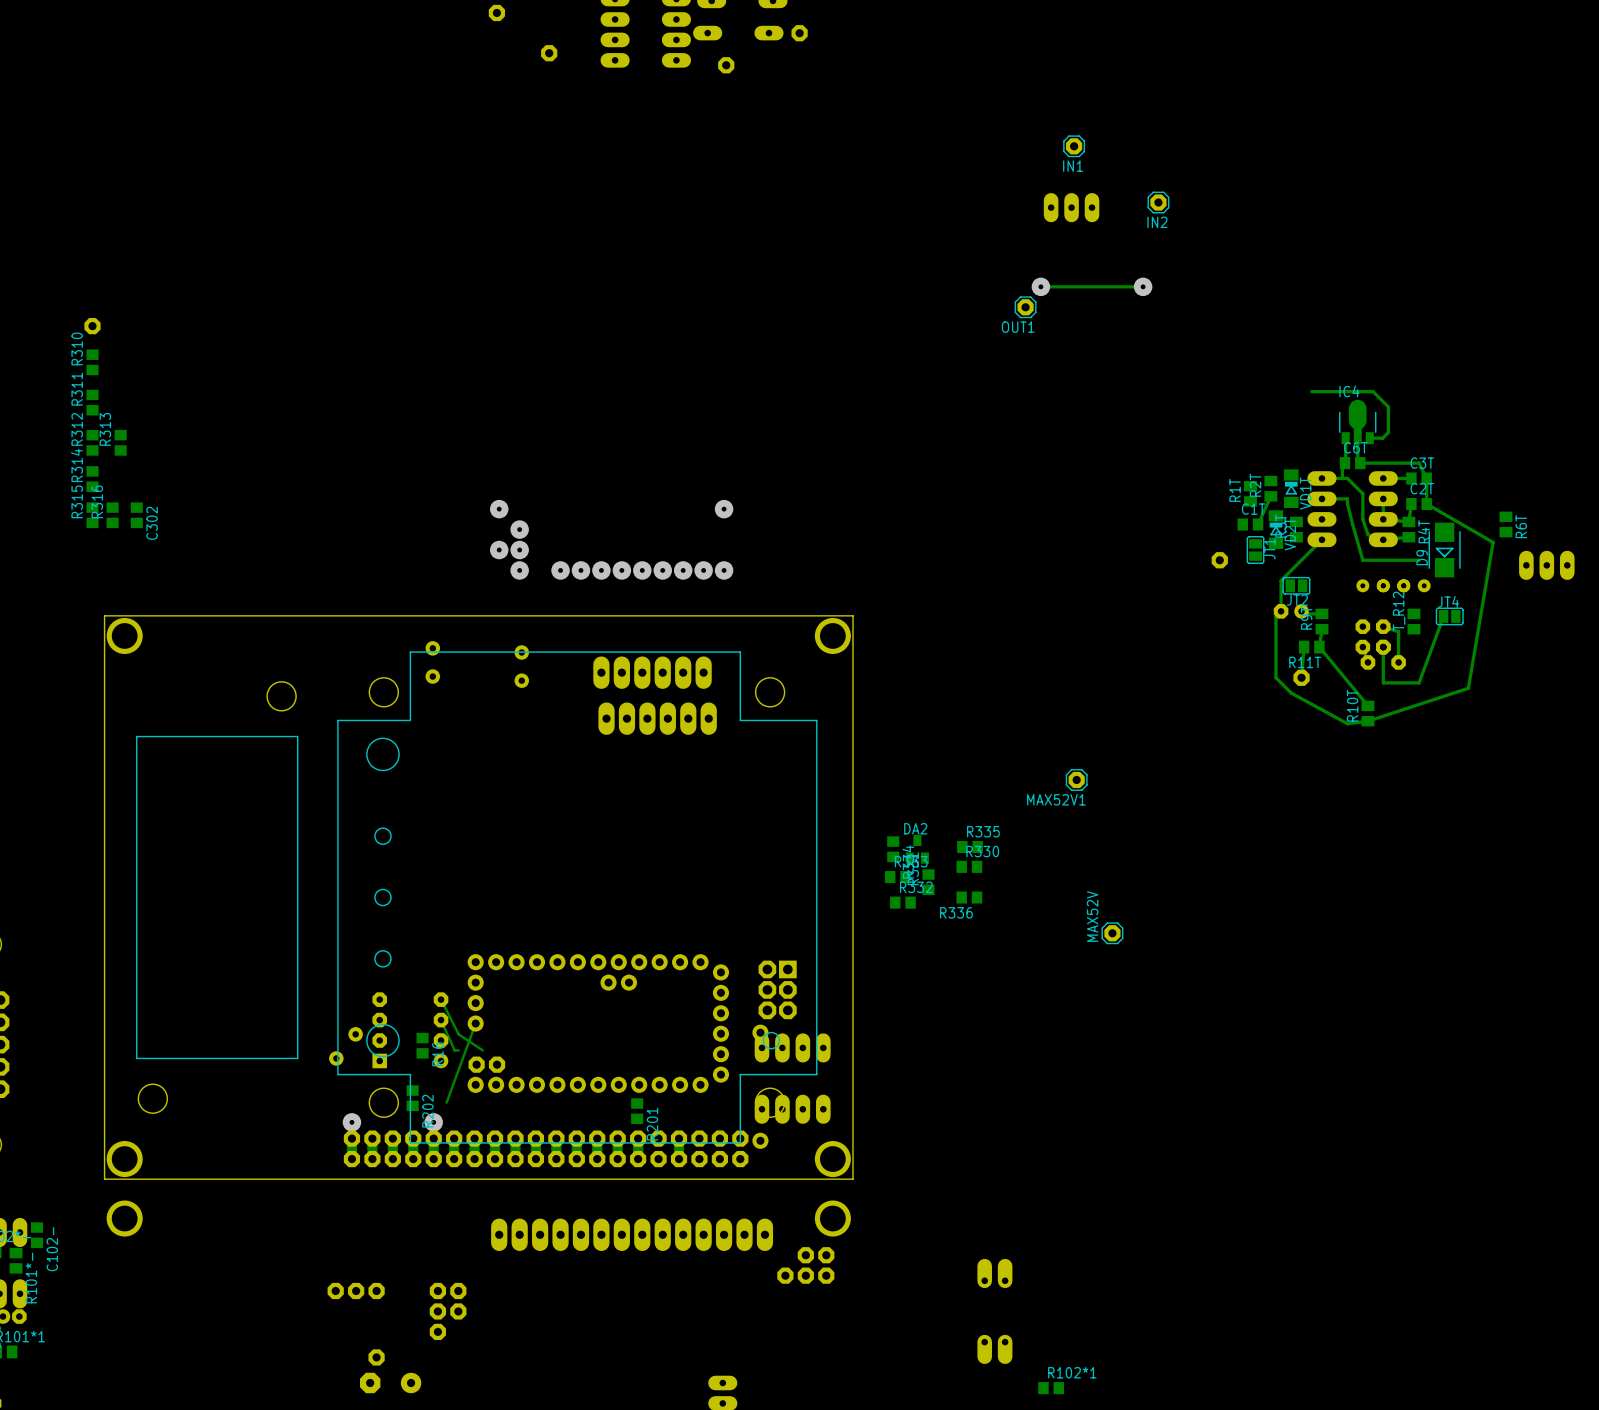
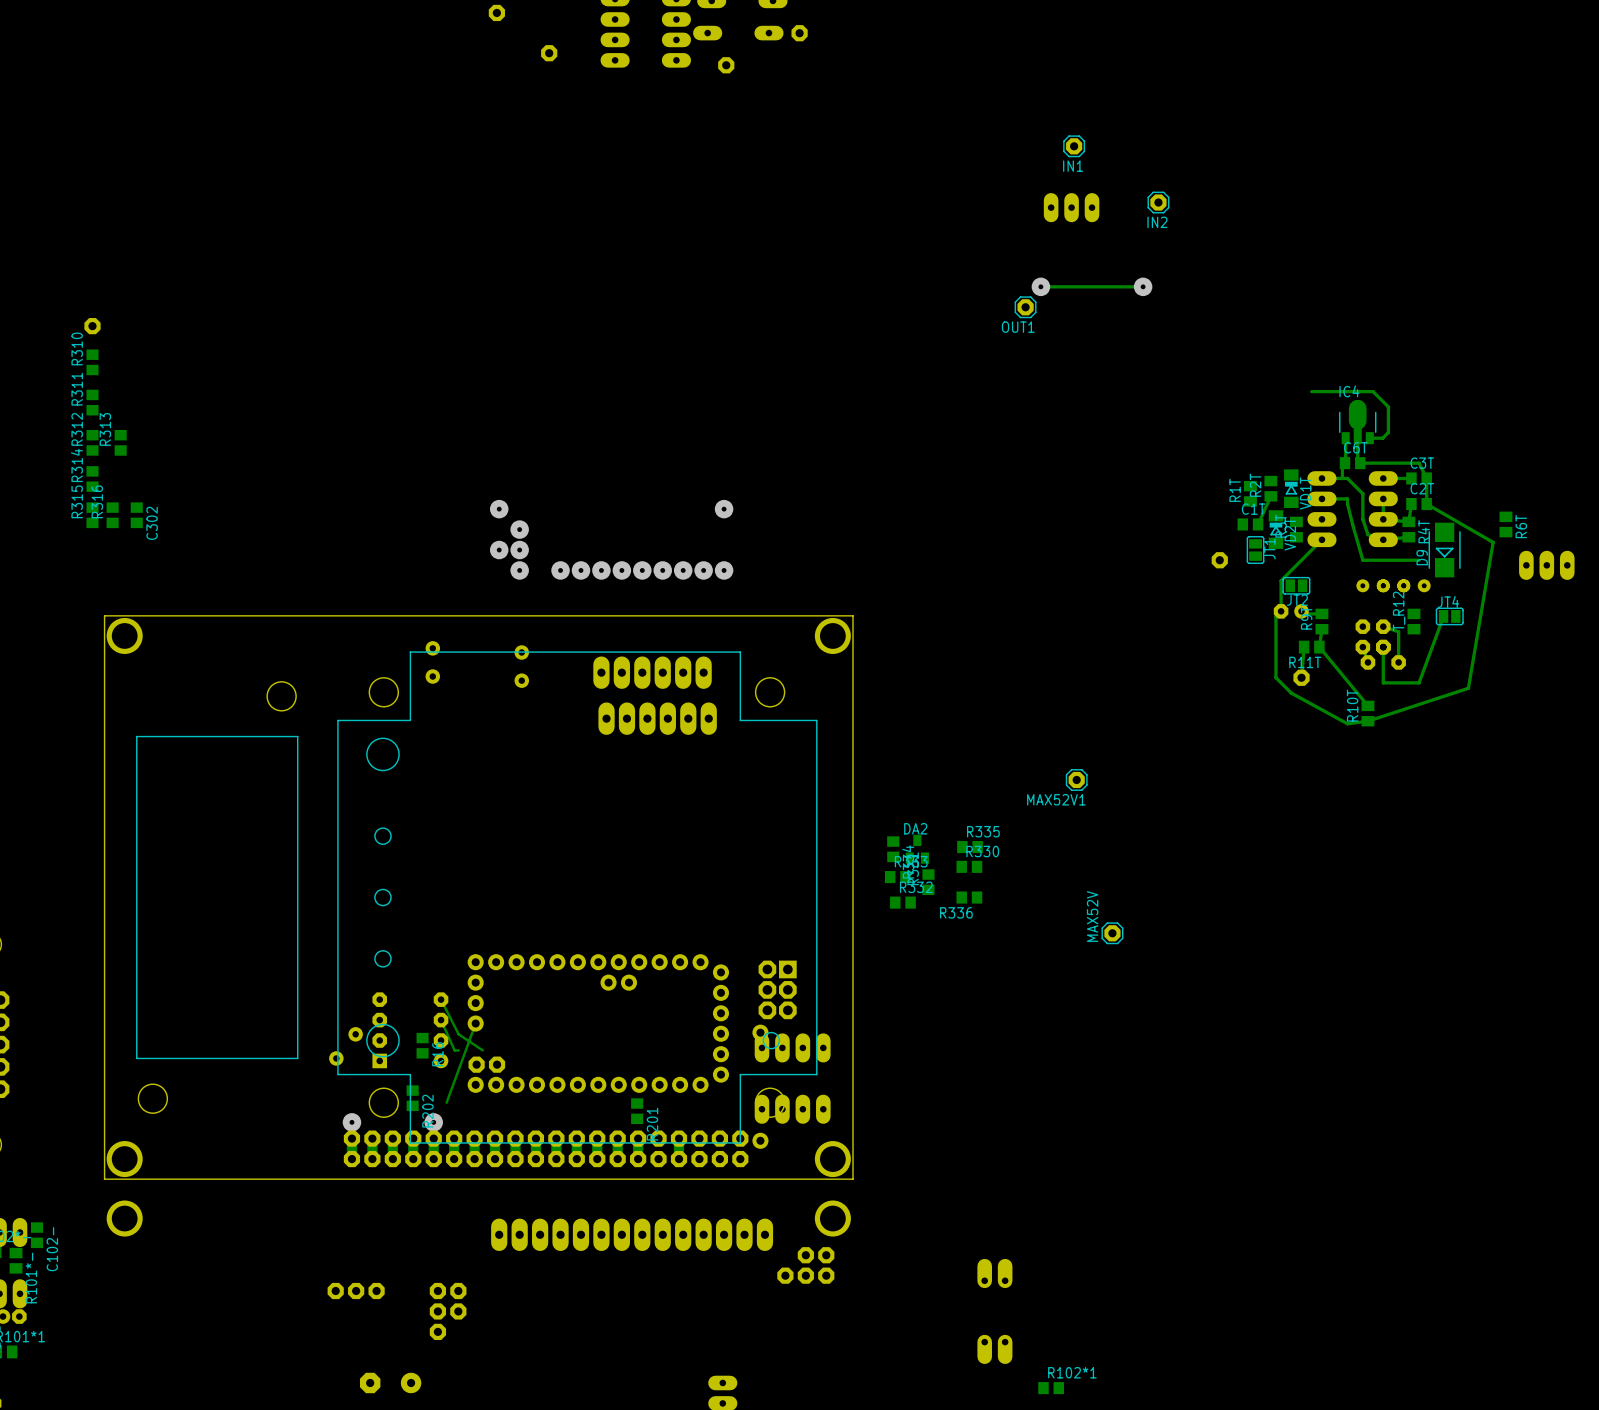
part: (376, 1357) -> none

